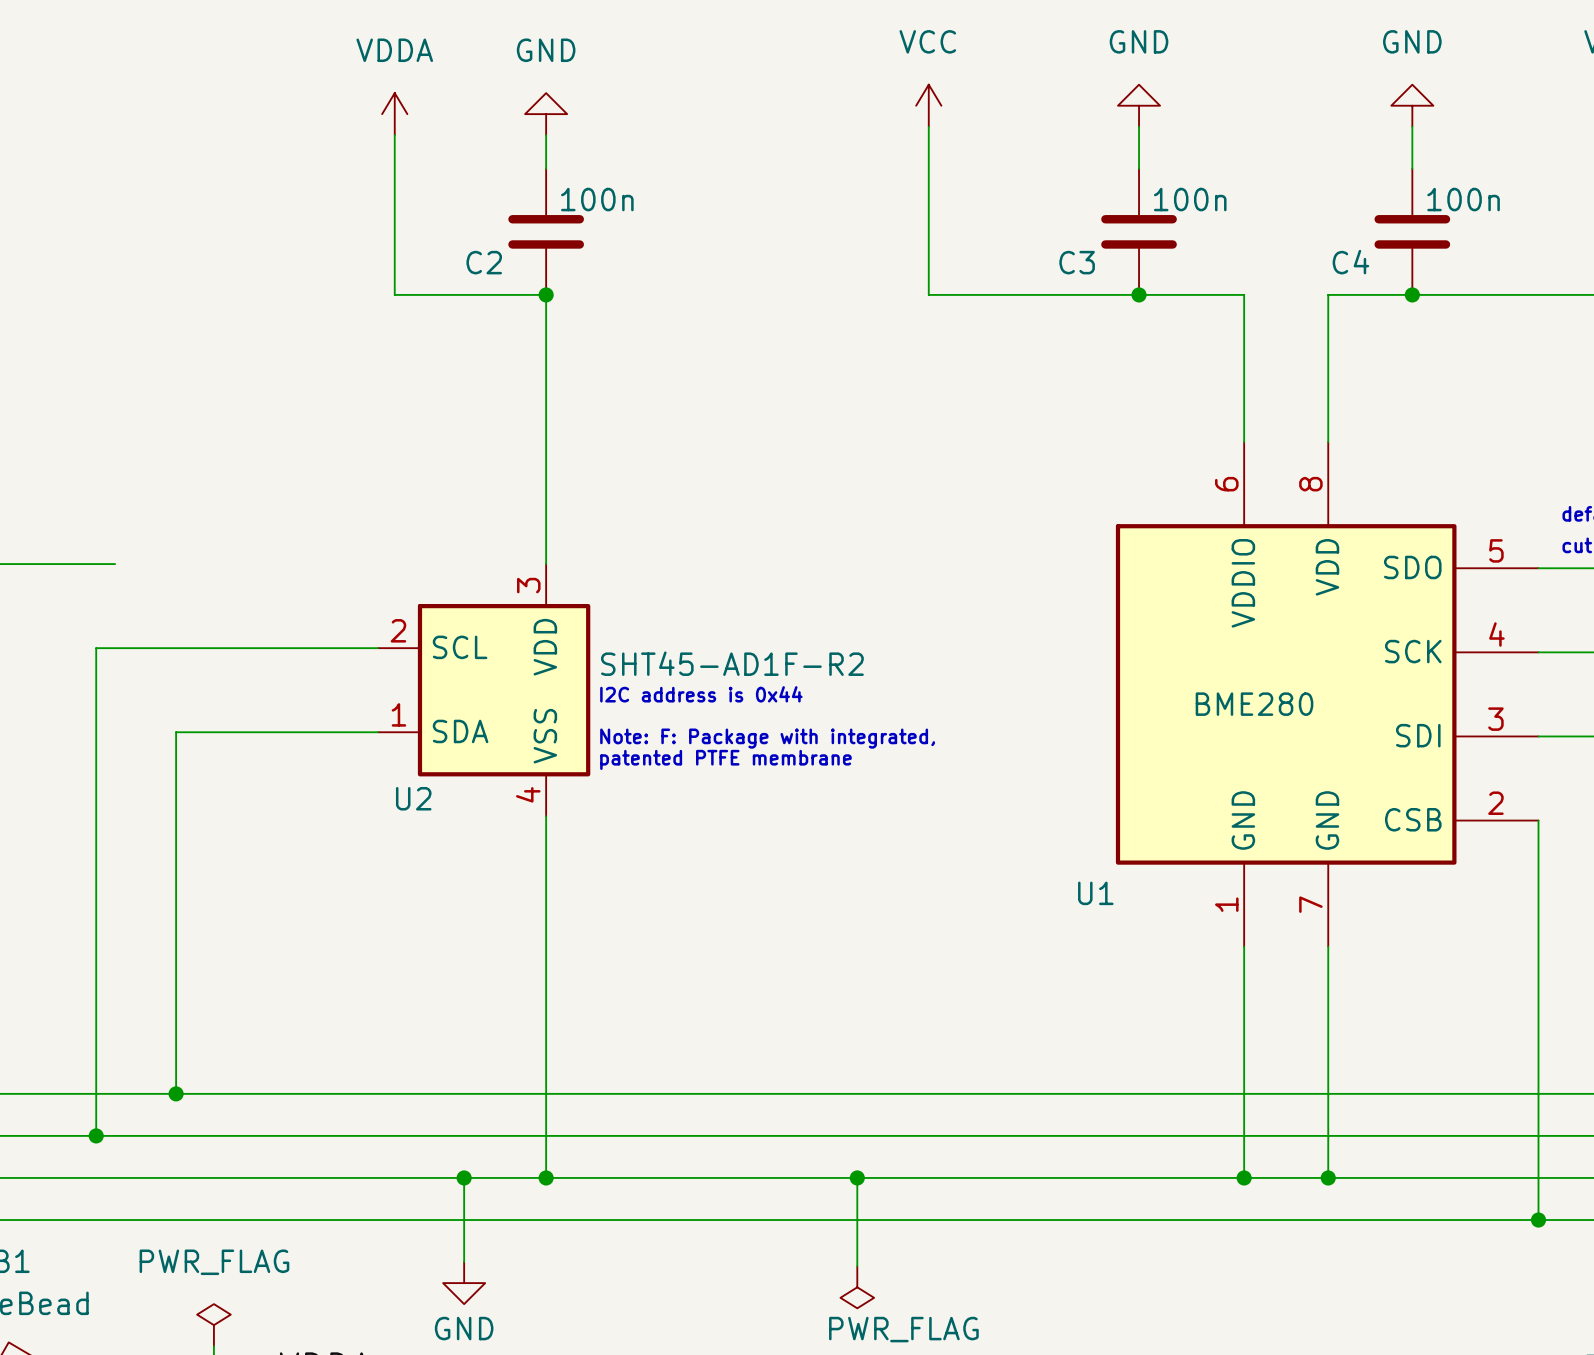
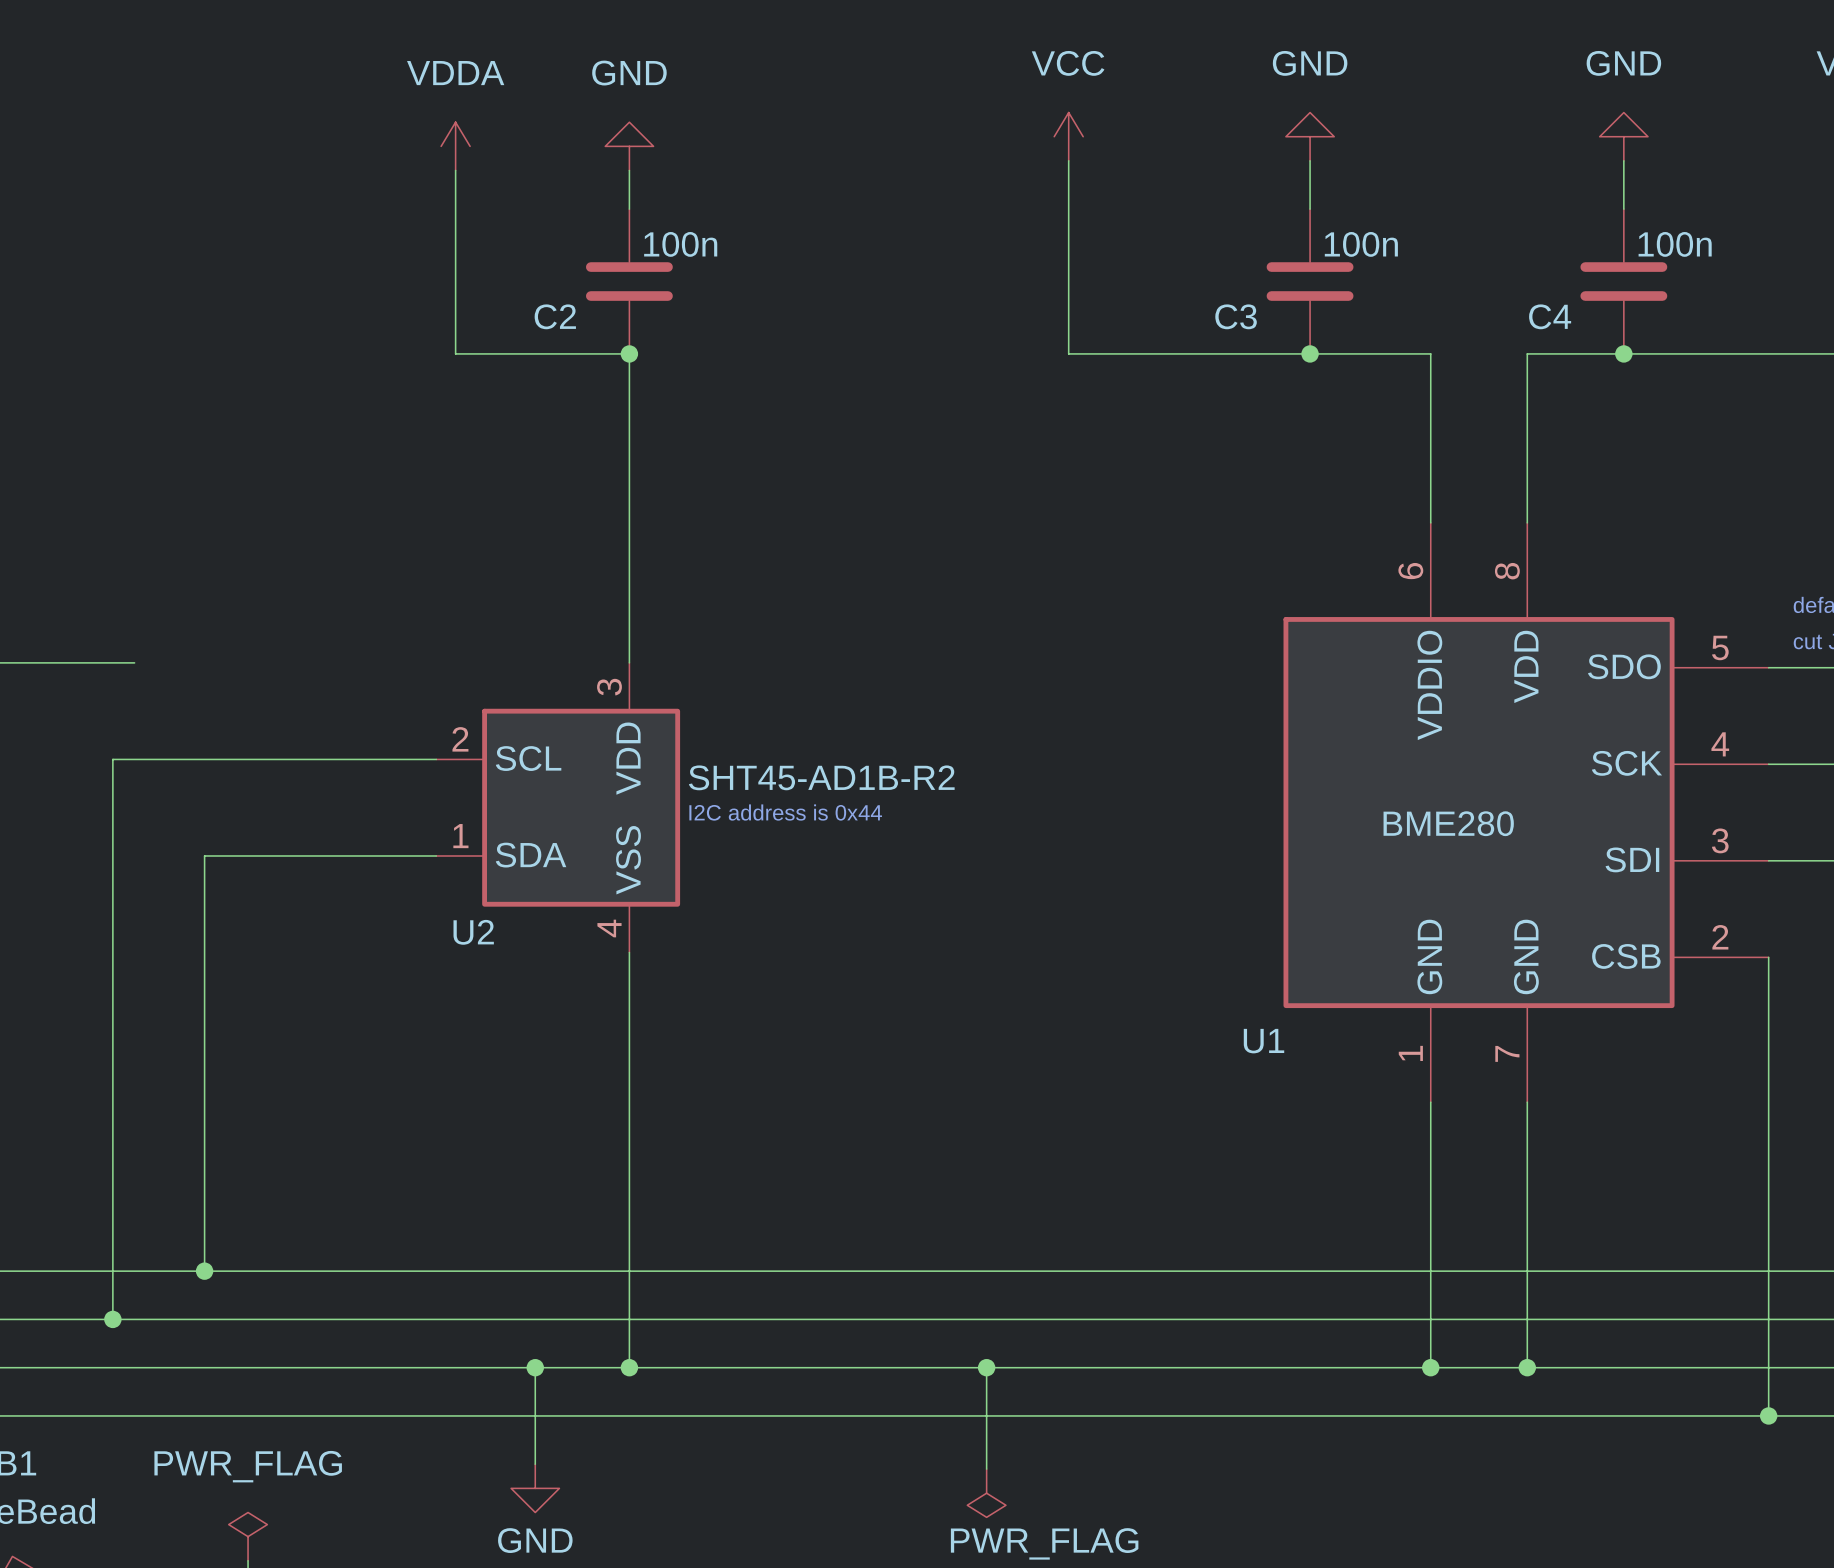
U2 value: SHT45-AD1F-R2 (732, 663) -> SHT45-AD1B-R2 (821, 777)
text: Note: F: Package with integrated, (767, 738) -> none
text: patented PTFE membrane (725, 759) -> none

